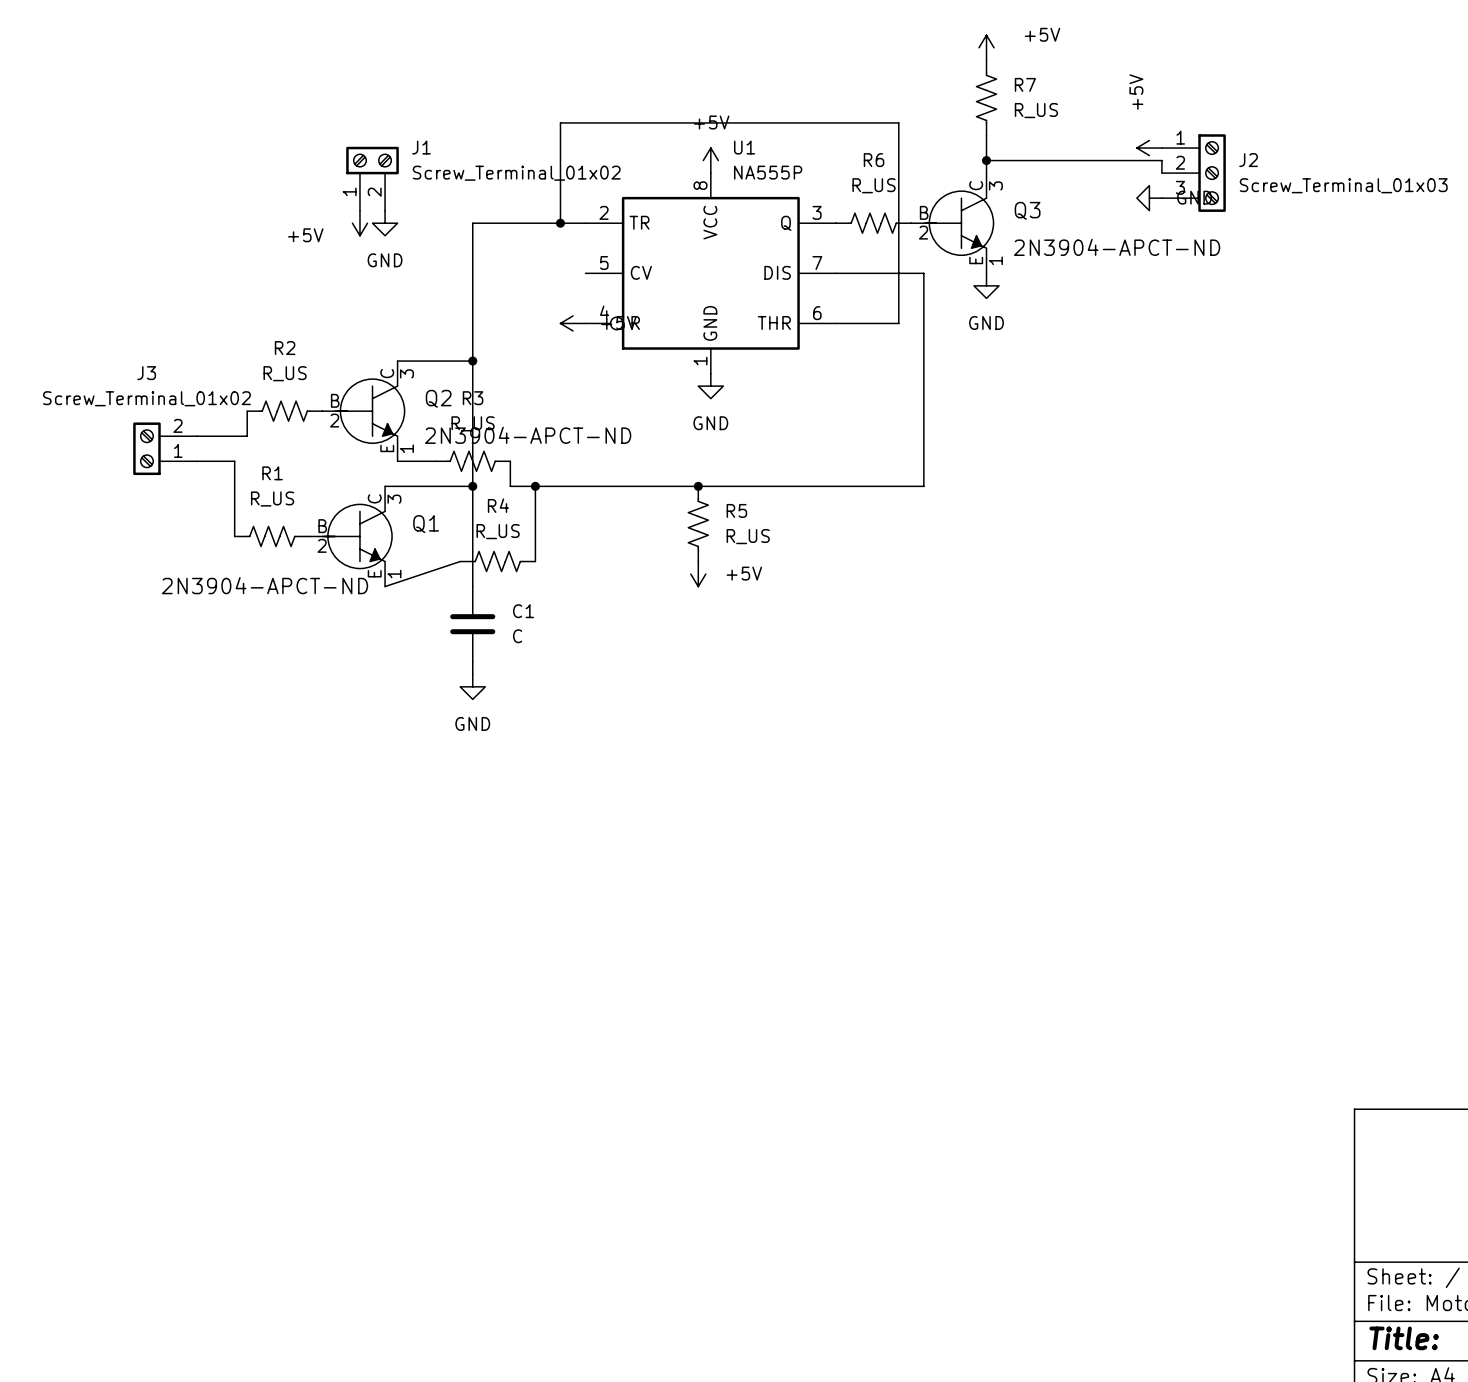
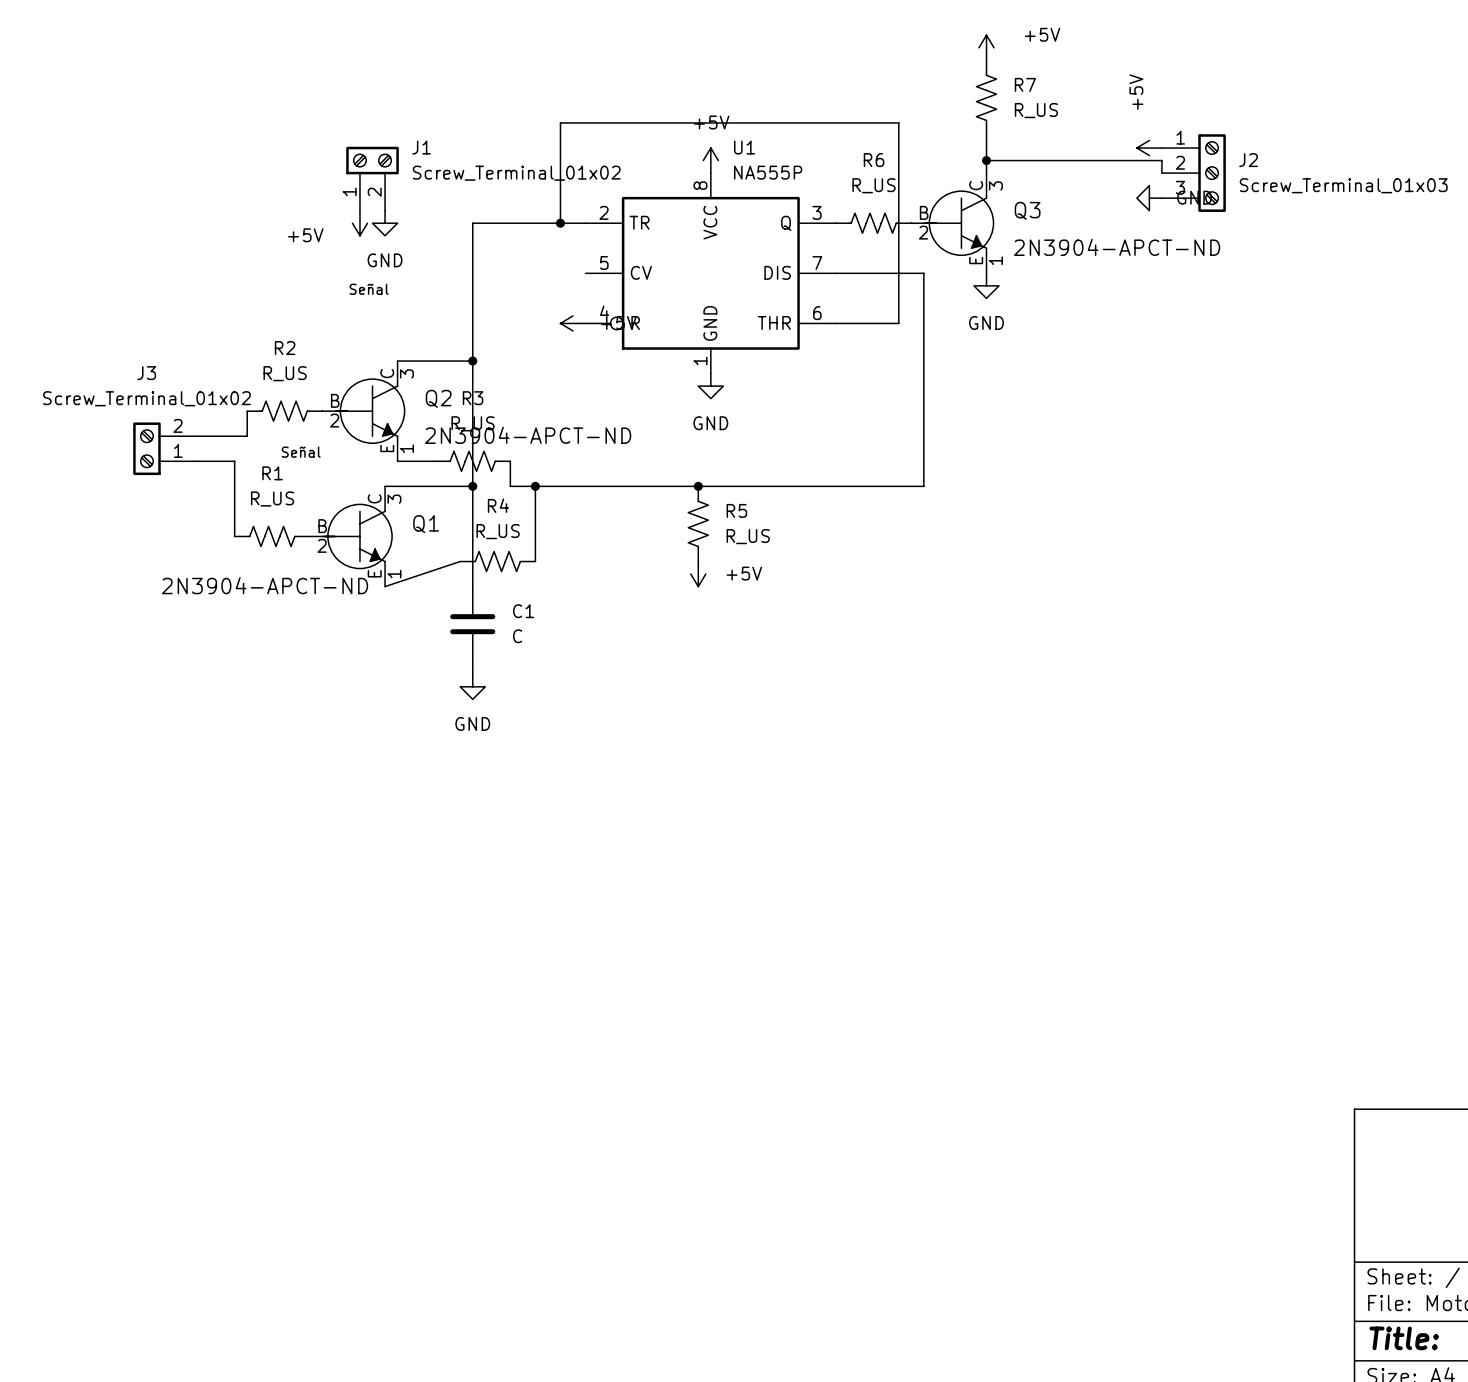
label: none -> Señal (369, 289)
label: none -> Señal (301, 452)

